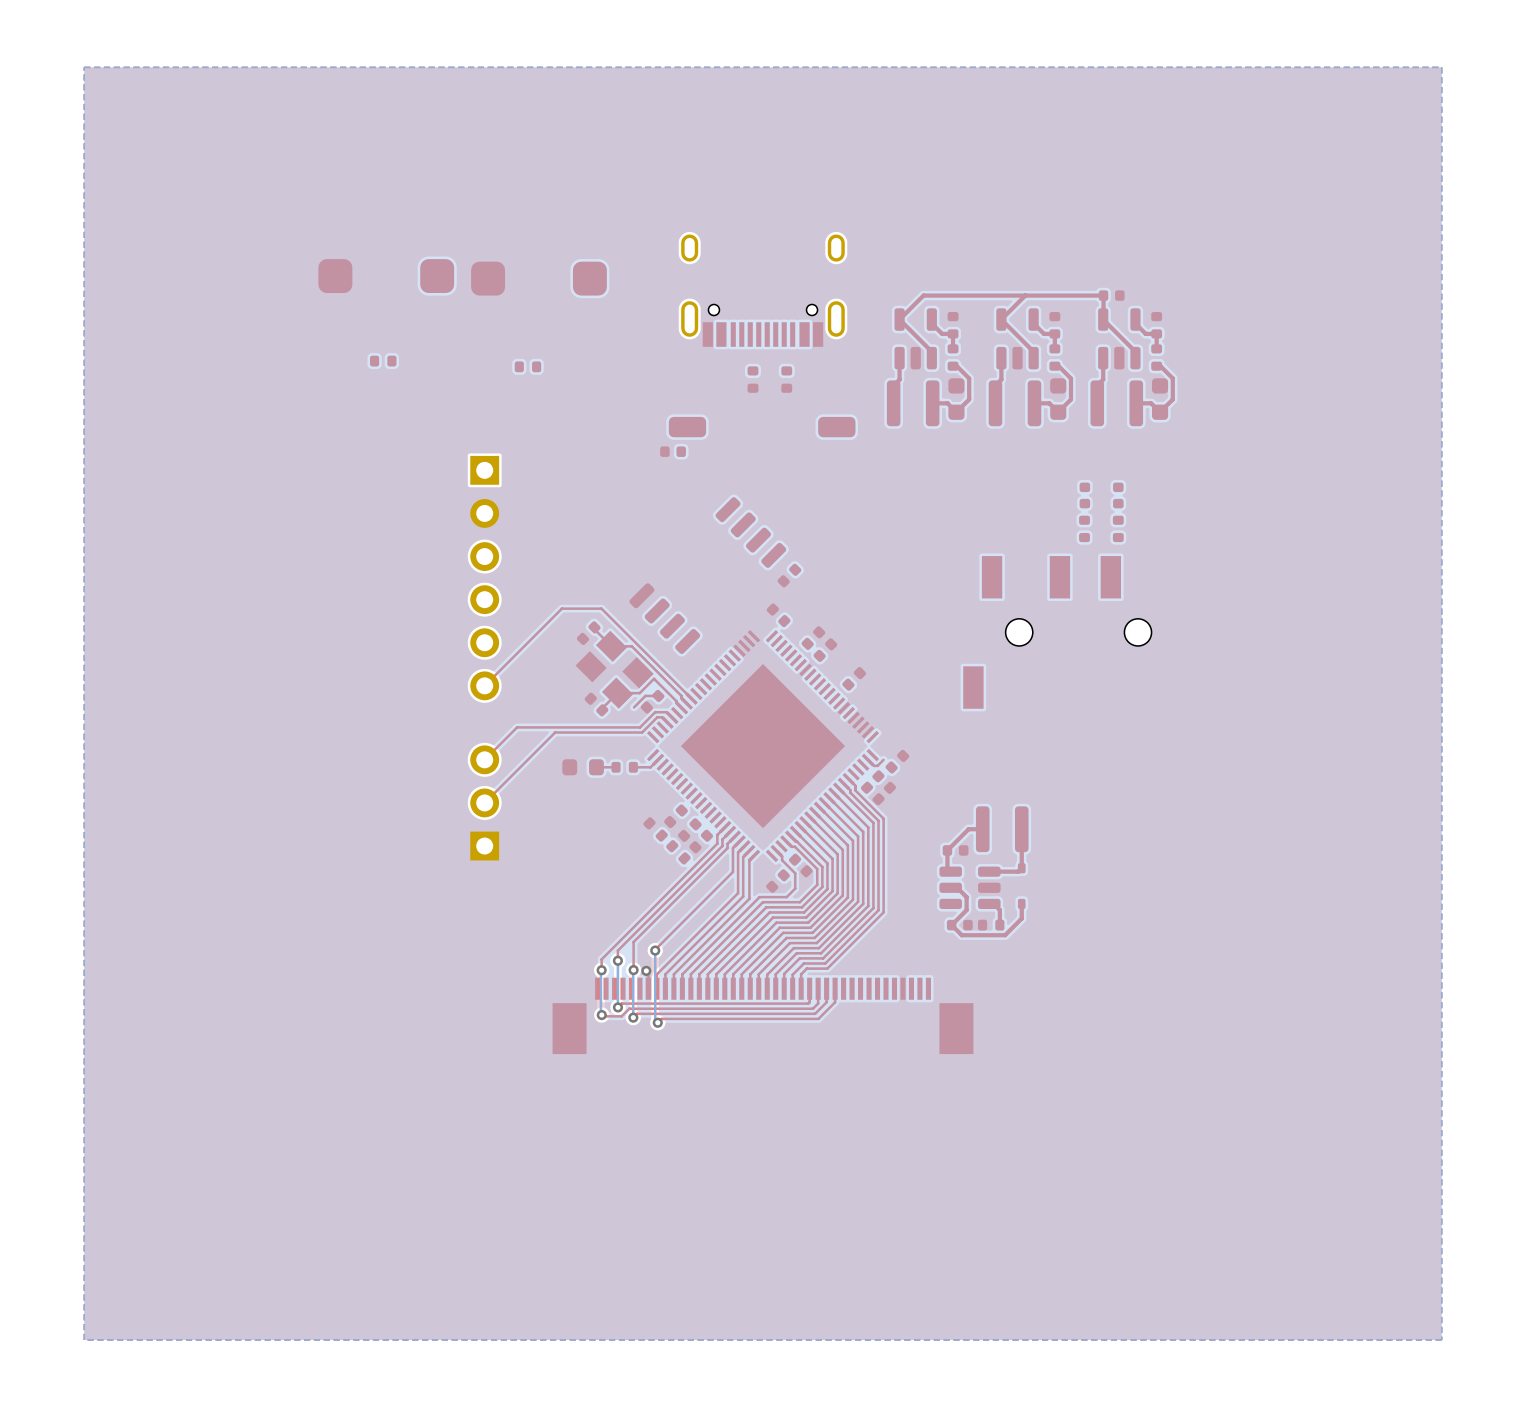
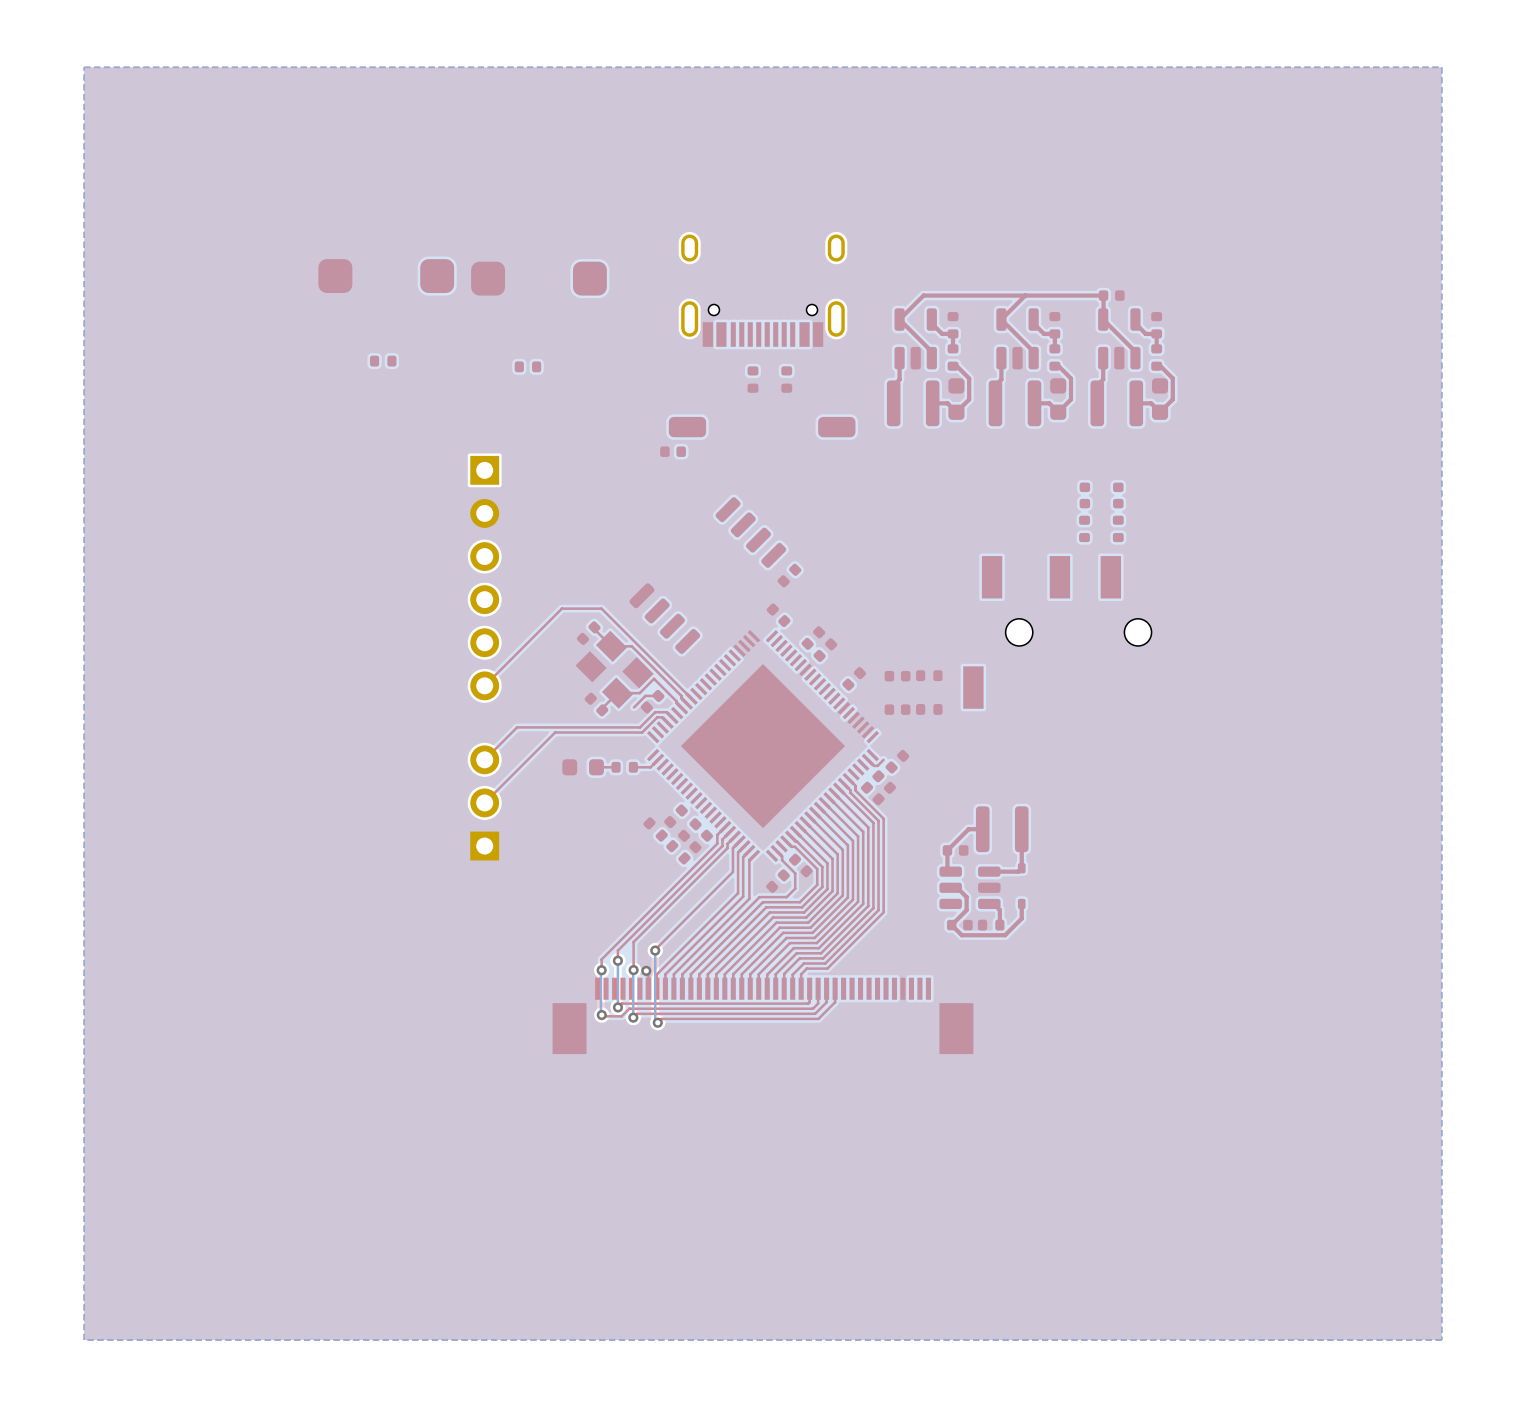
part: none -> (929, 675)
part: none -> (897, 676)
part: none -> (897, 709)
part: none -> (929, 709)

